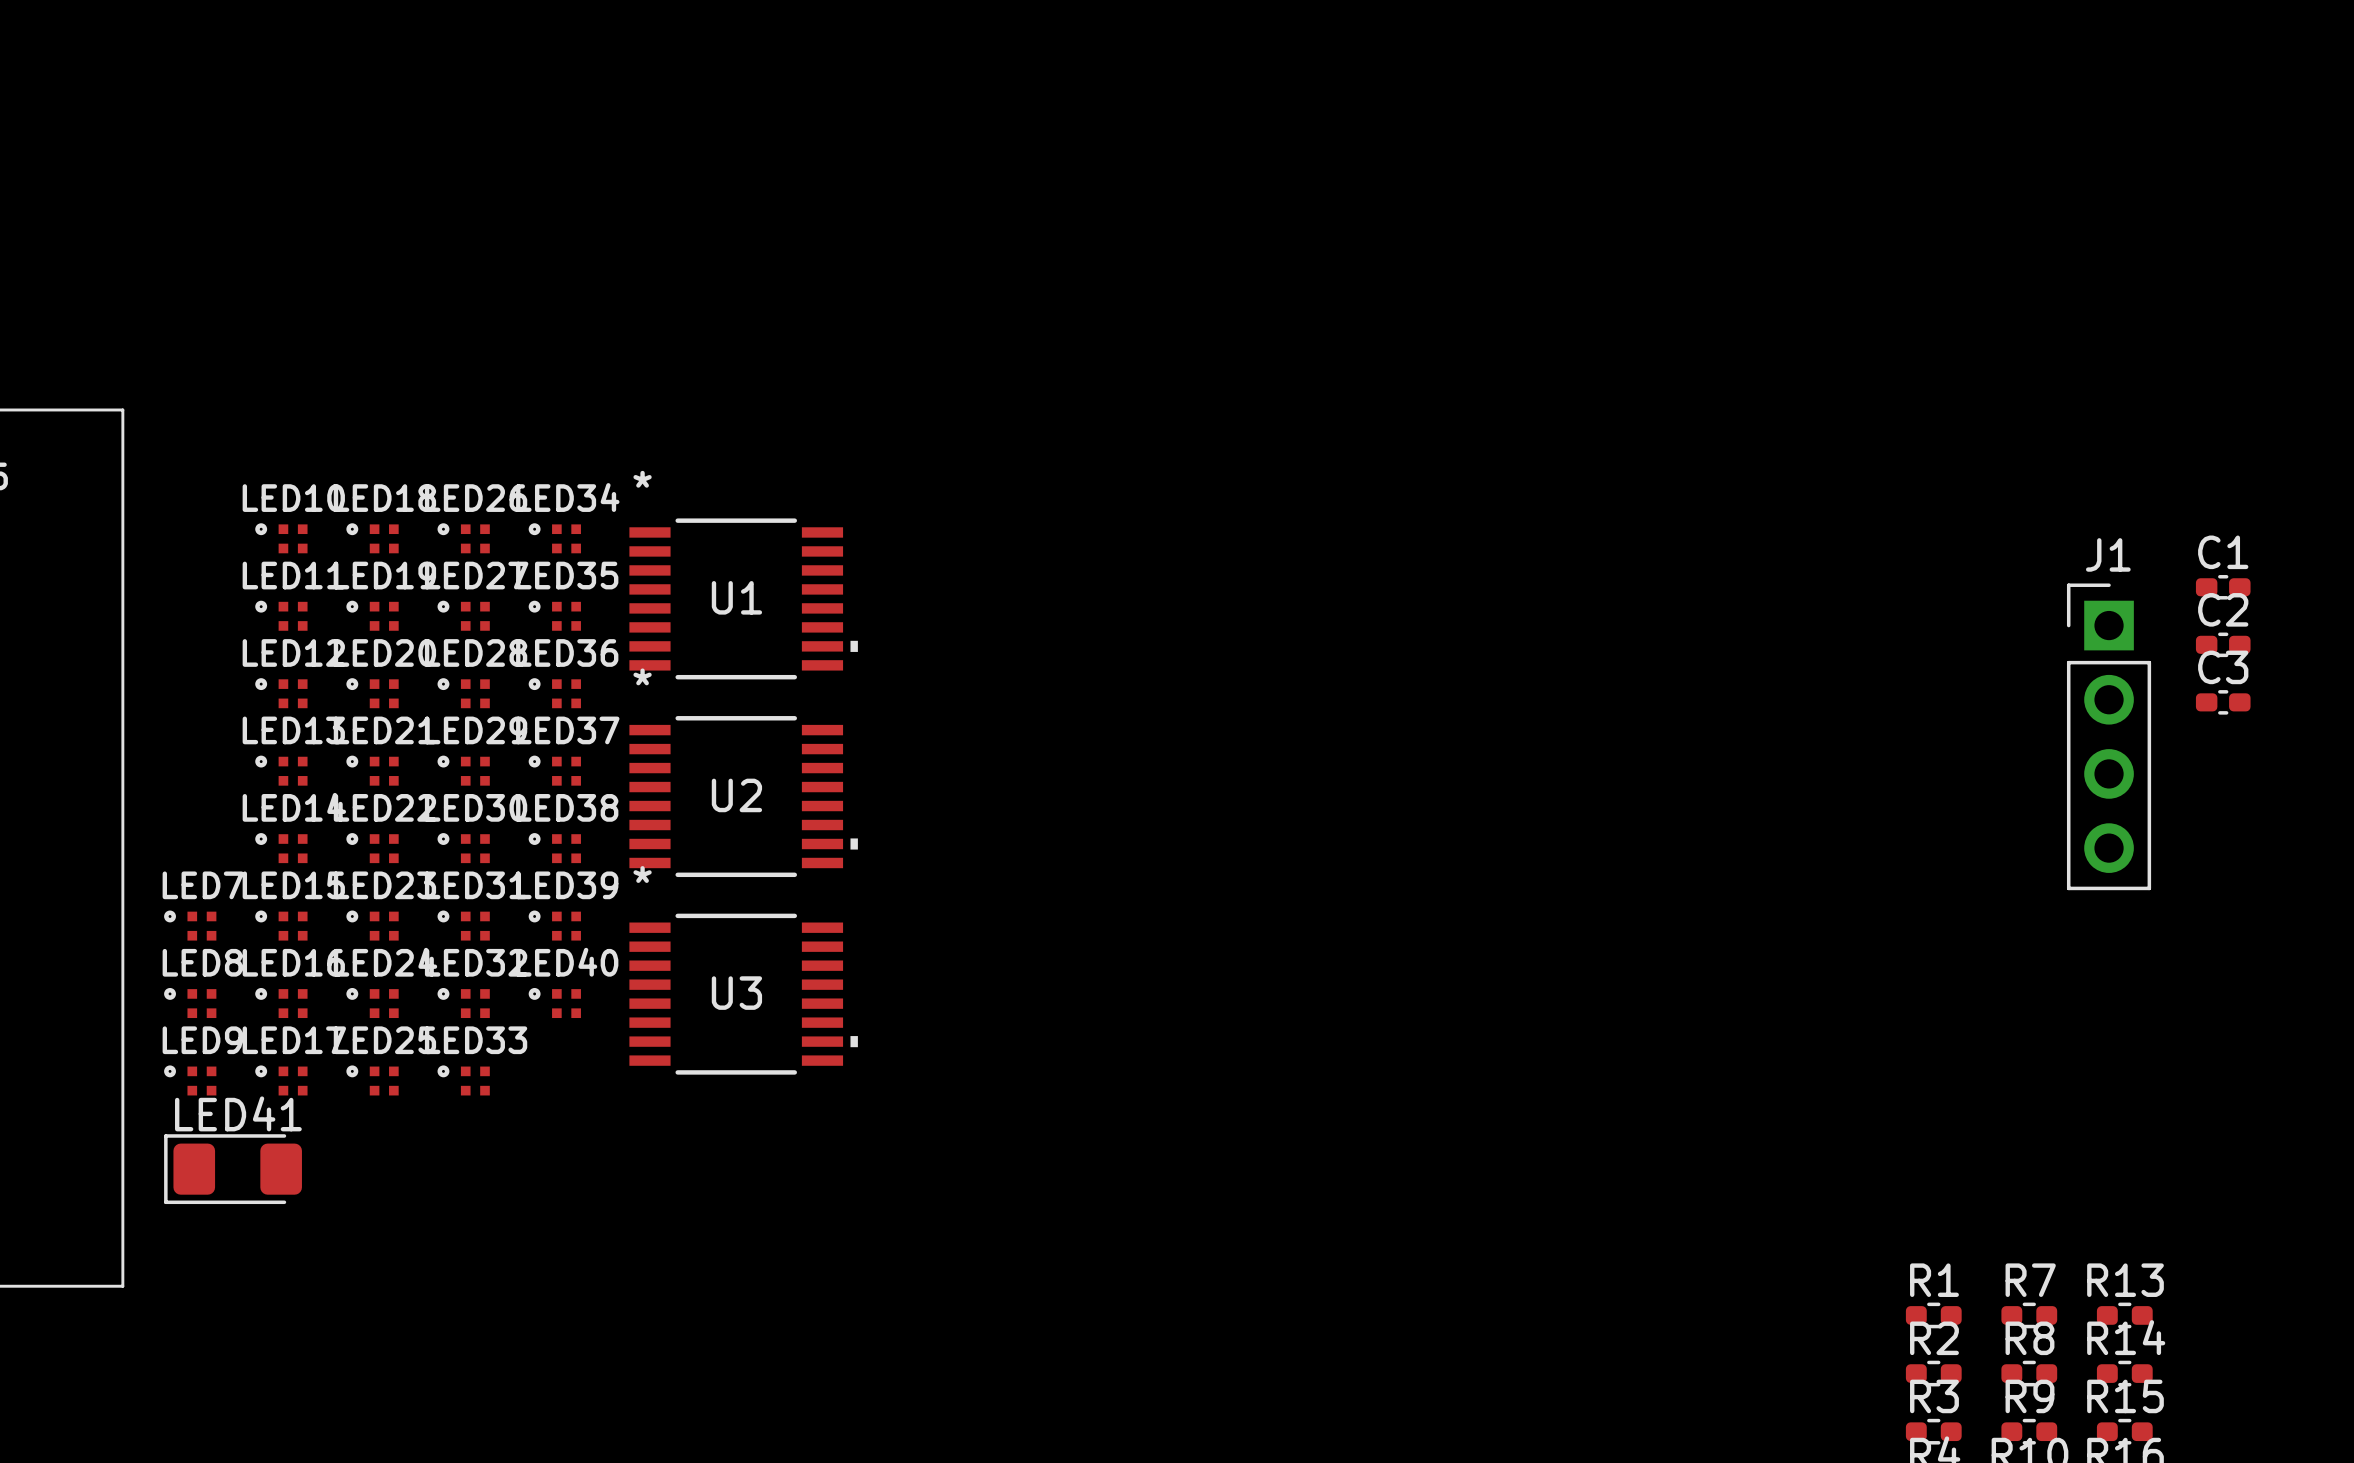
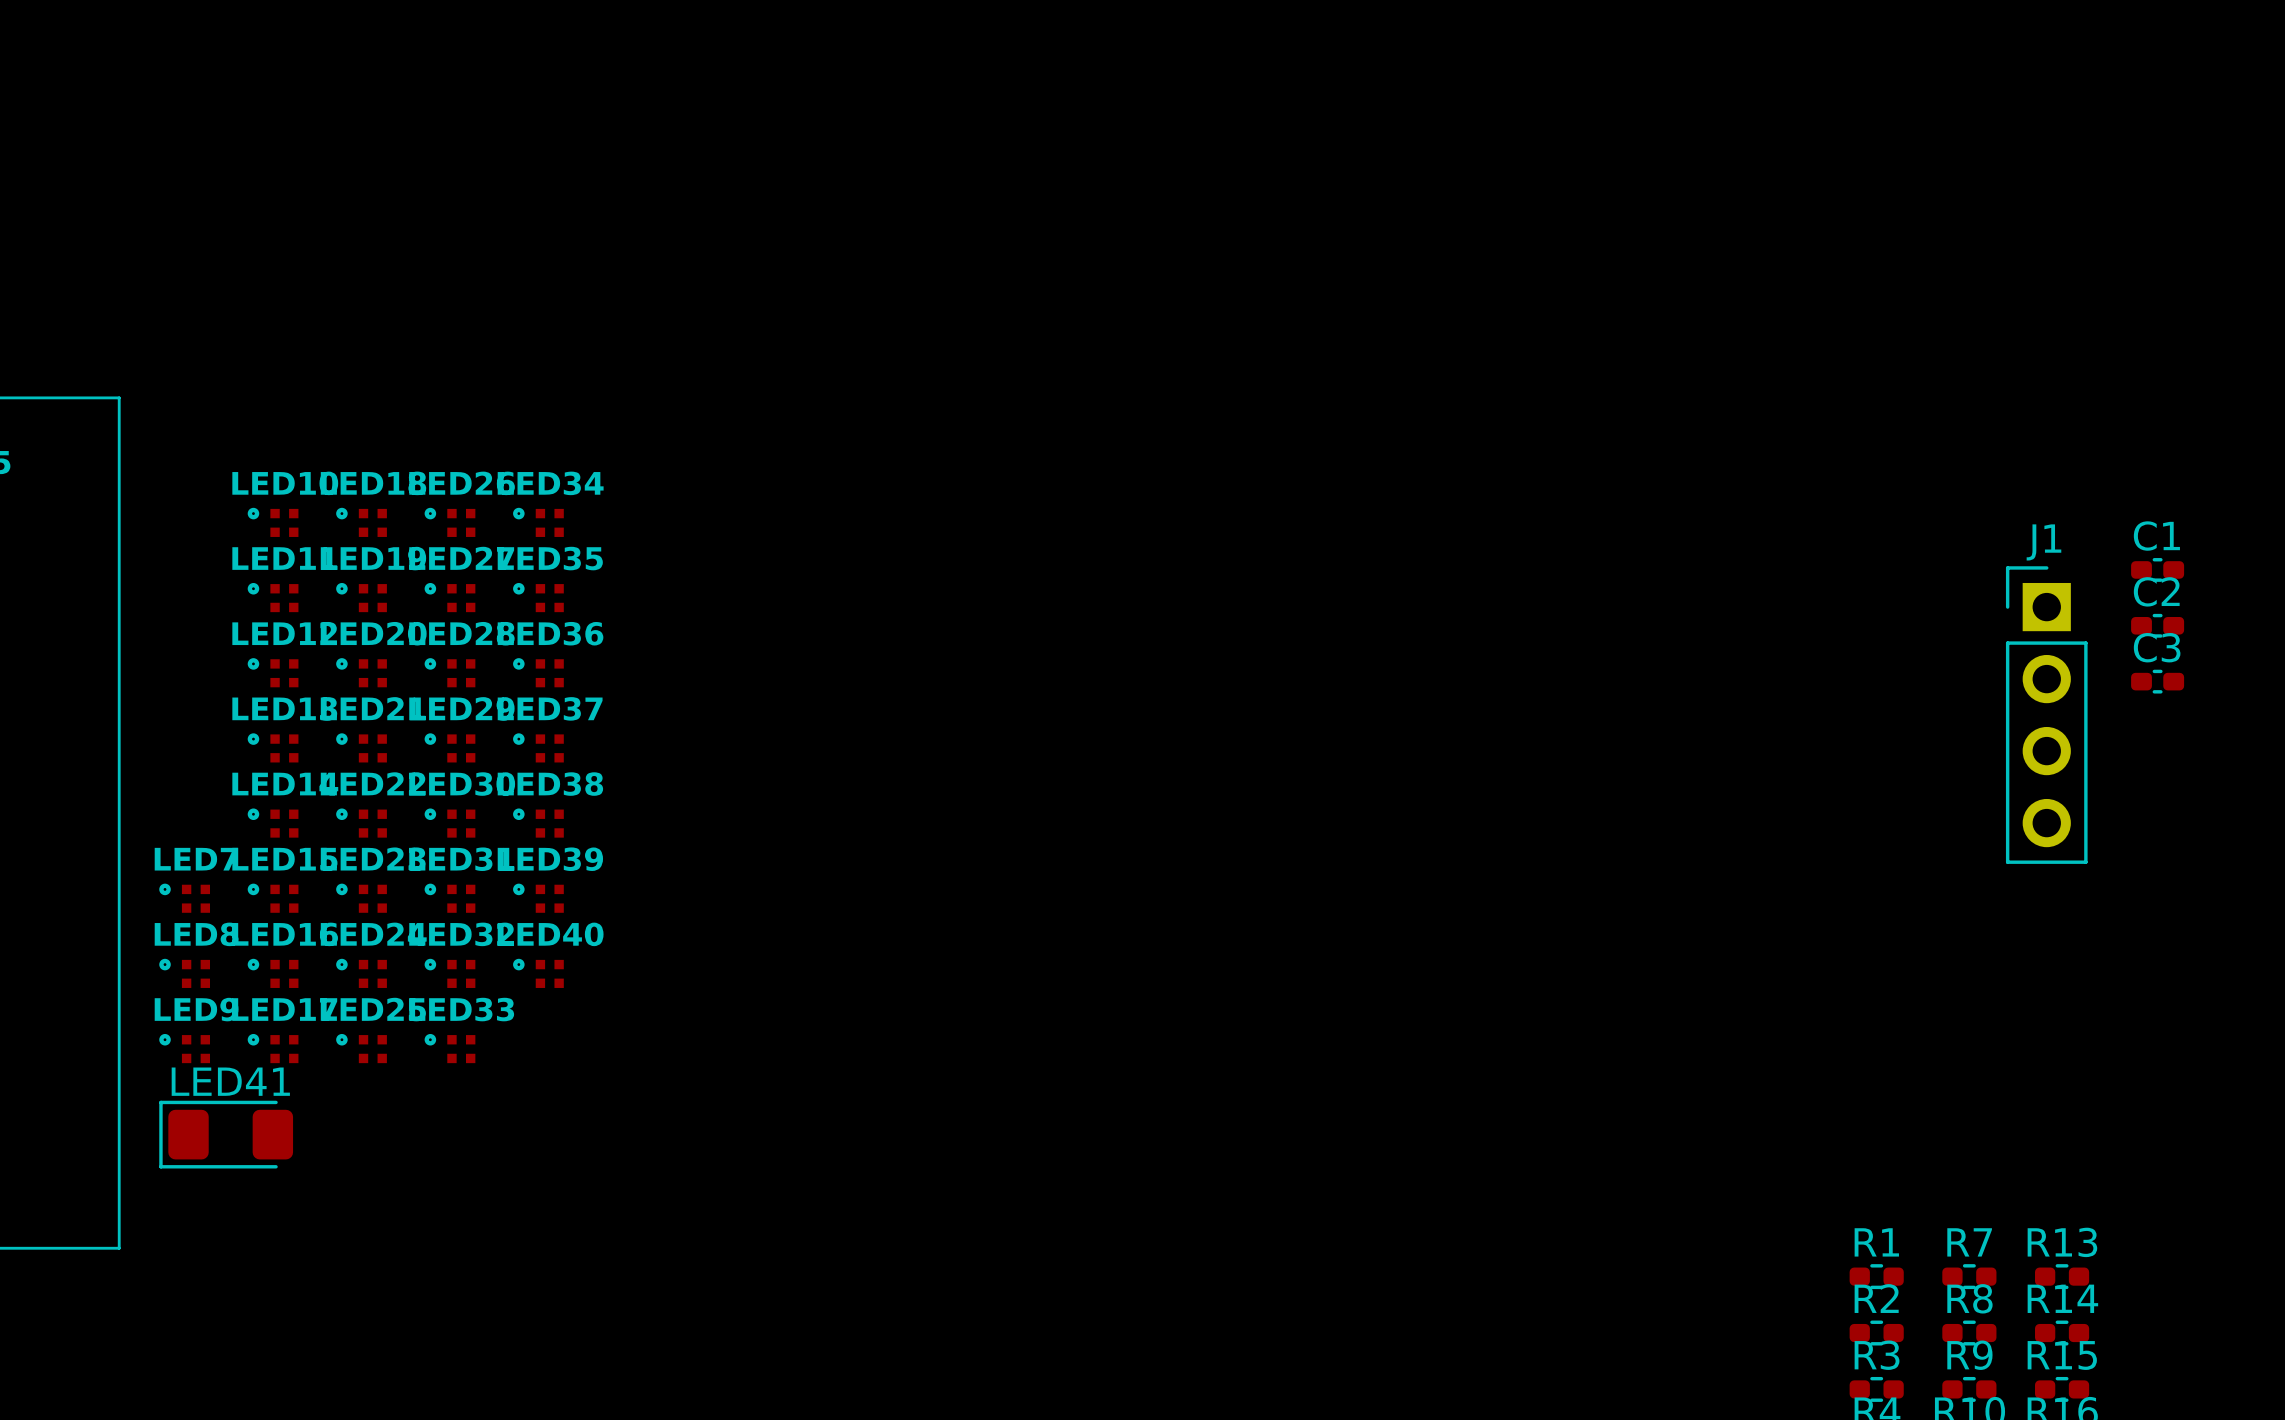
U1: (743, 598) -> none
U2: (743, 796) -> none
U3: (743, 994) -> none

